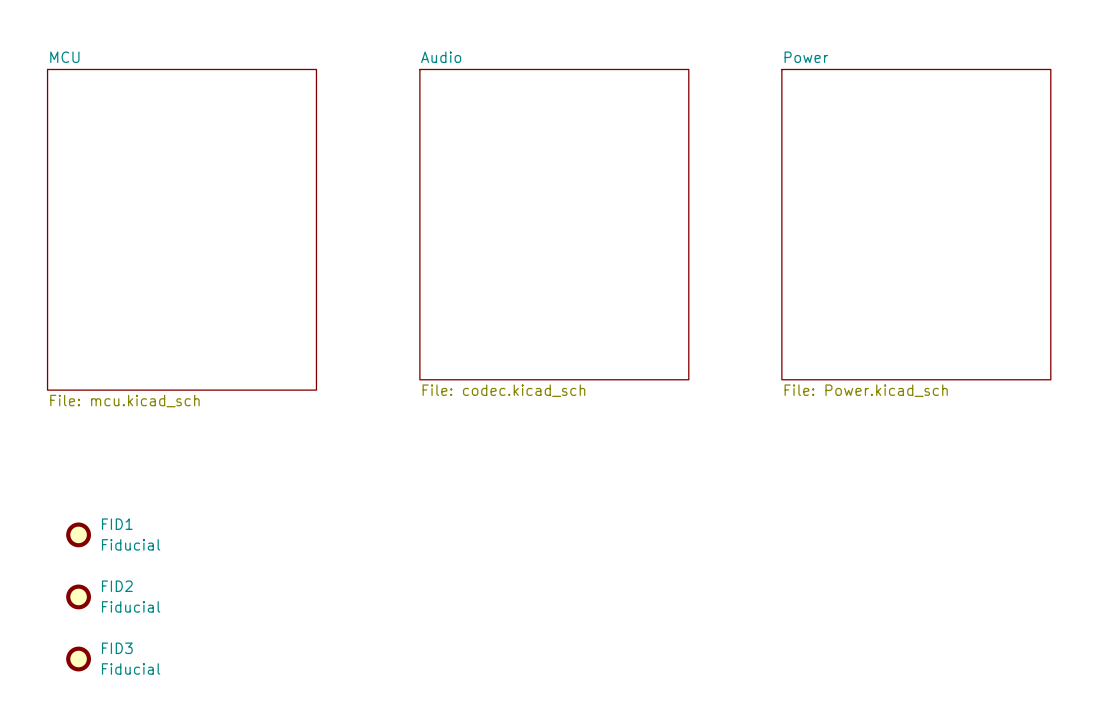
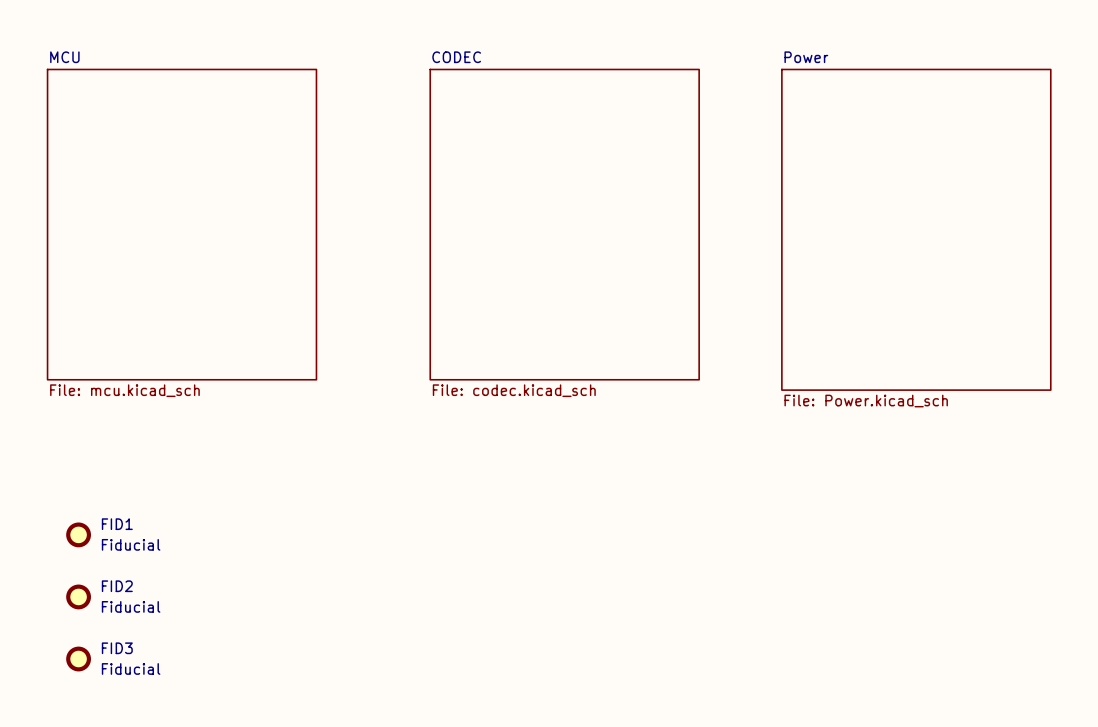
sheet MCU shape: [46, 68, 318, 391] -> [46, 68, 318, 381]
sheet Power shape: [781, 68, 1052, 381] -> [781, 68, 1052, 391]
sheet Audio: File: codec.kicad_sch (554, 224) -> none
sheet CODEC: none -> File: codec.kicad_sch (564, 224)

